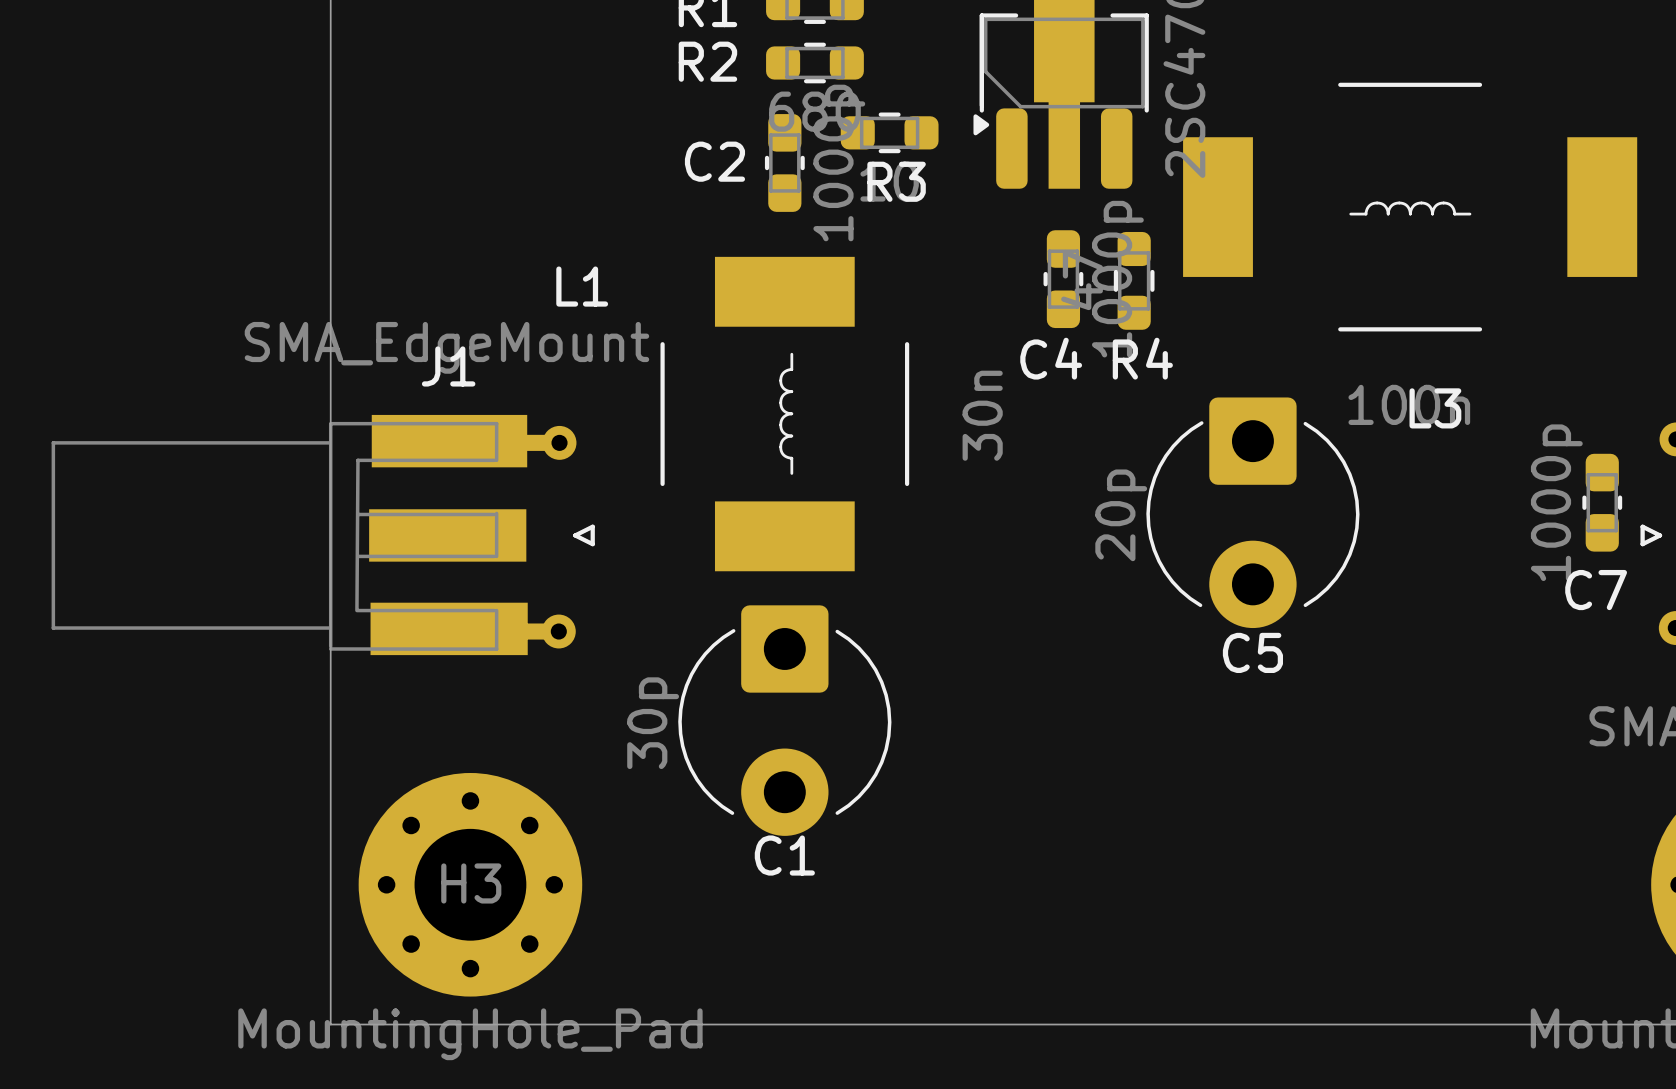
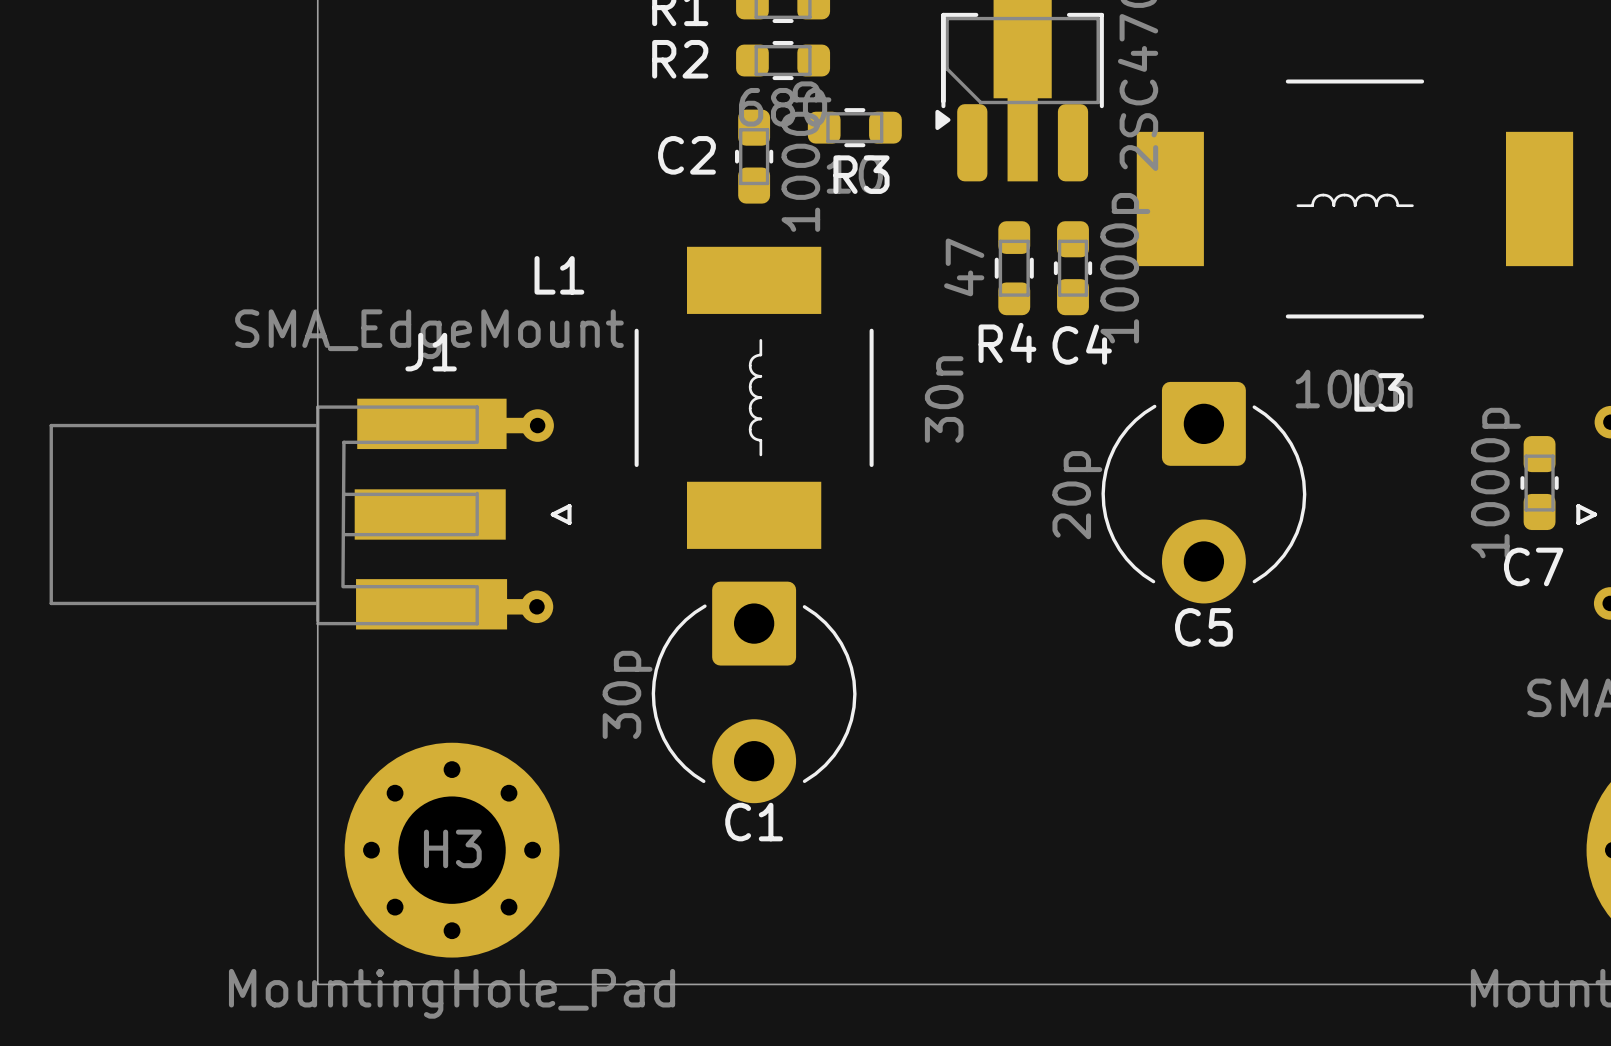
C4 position: (1063, 279) -> (1073, 268)
R4 position: (1134, 280) -> (1014, 268)
C4 name position: C4 (1051, 358) -> C4 (1082, 344)
R4 name position: R4 (1142, 358) -> R4 (1007, 342)

